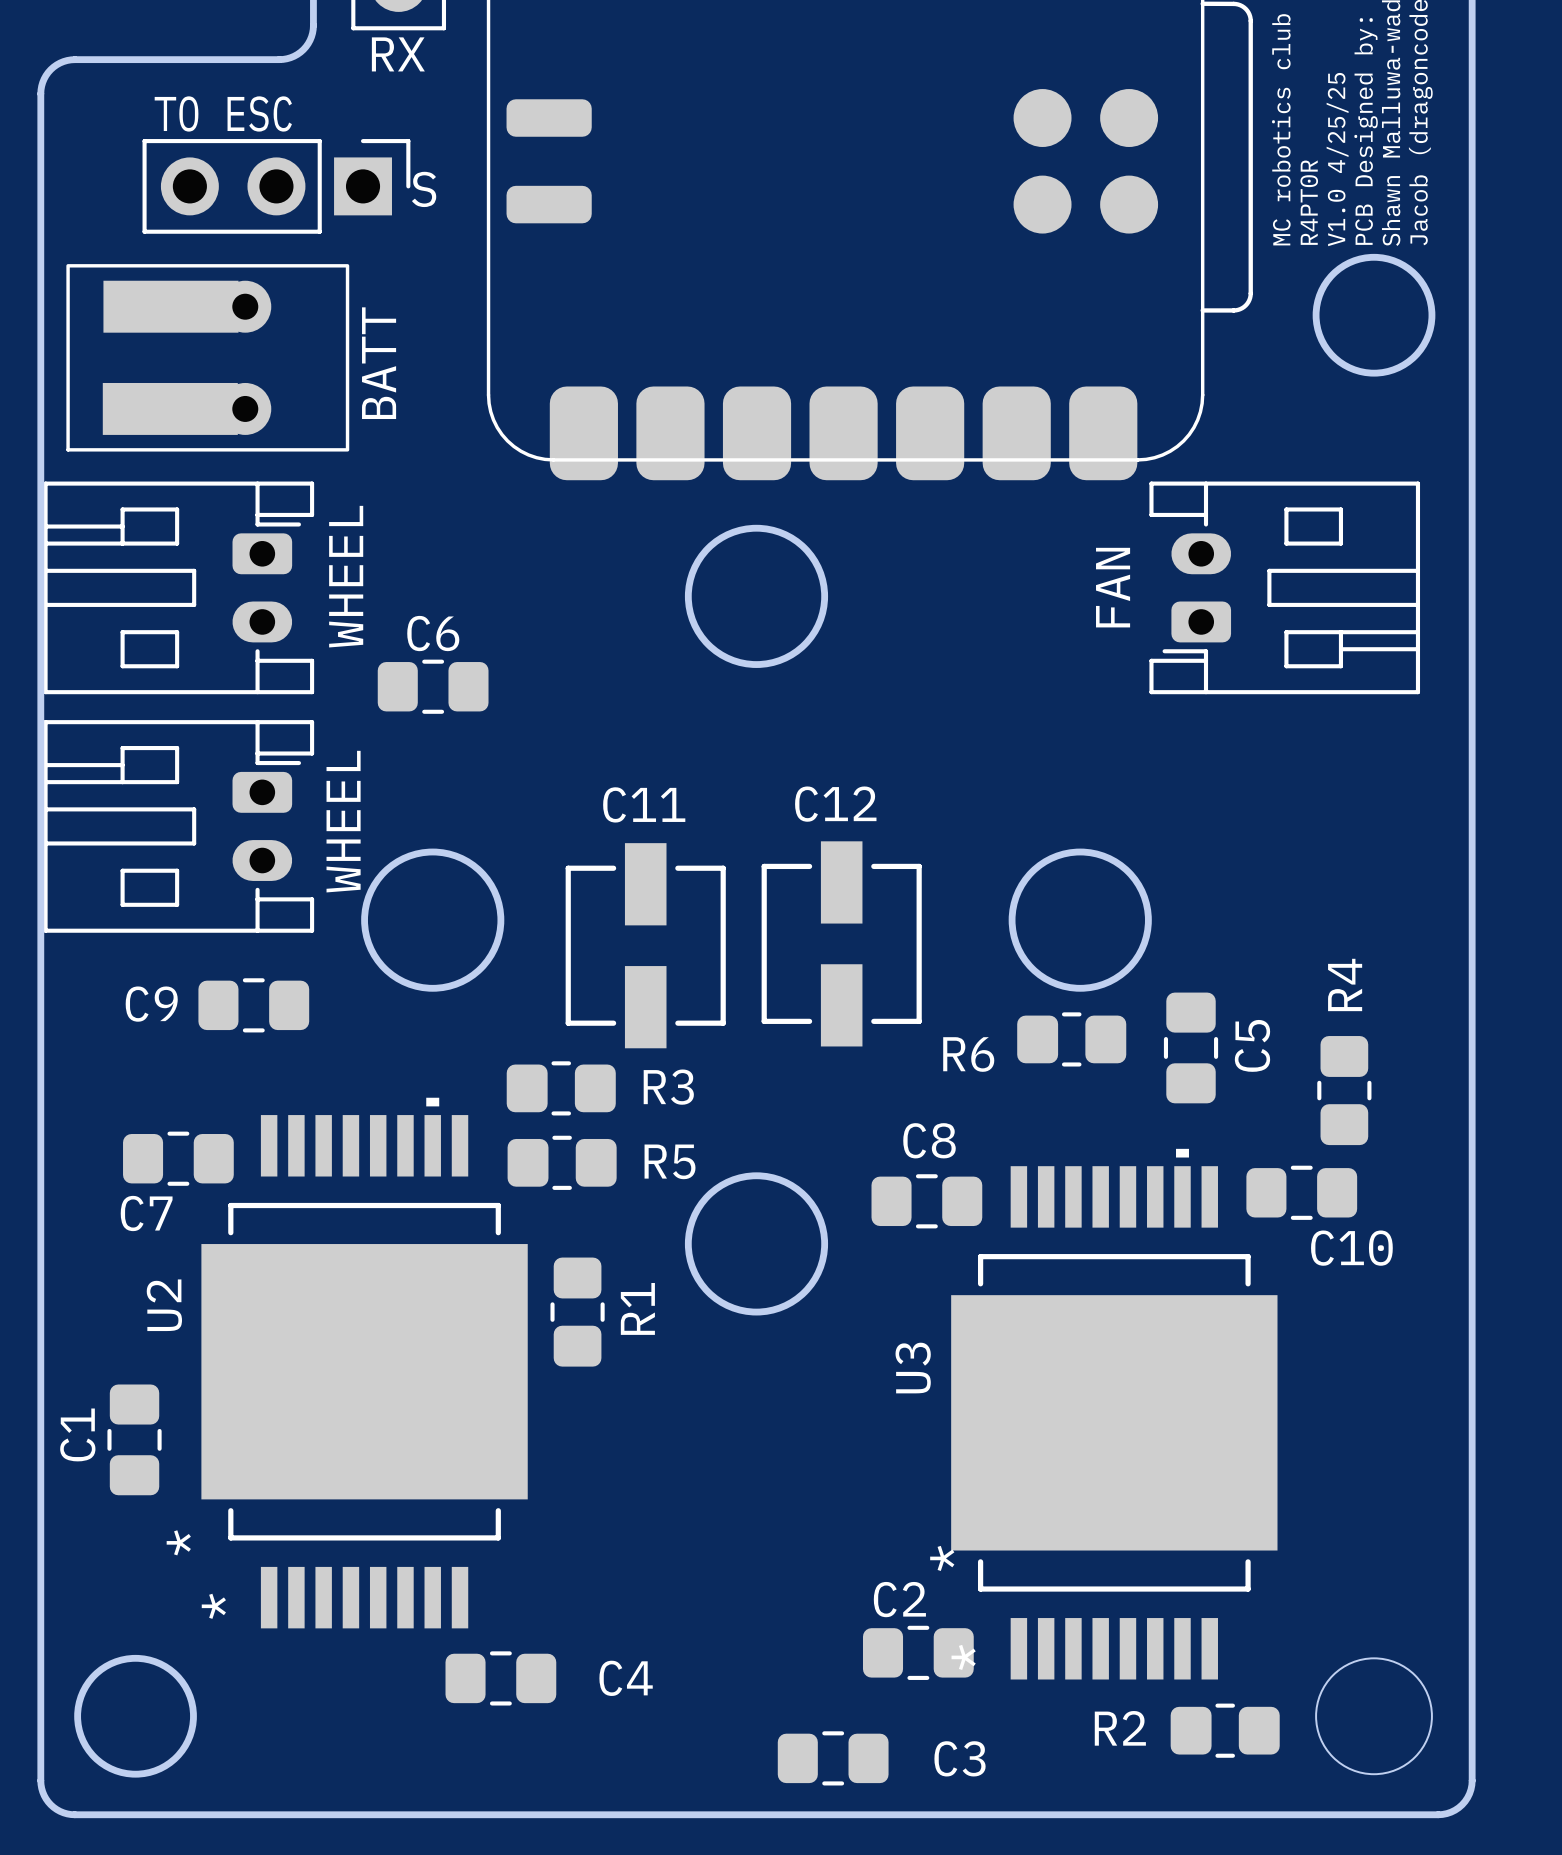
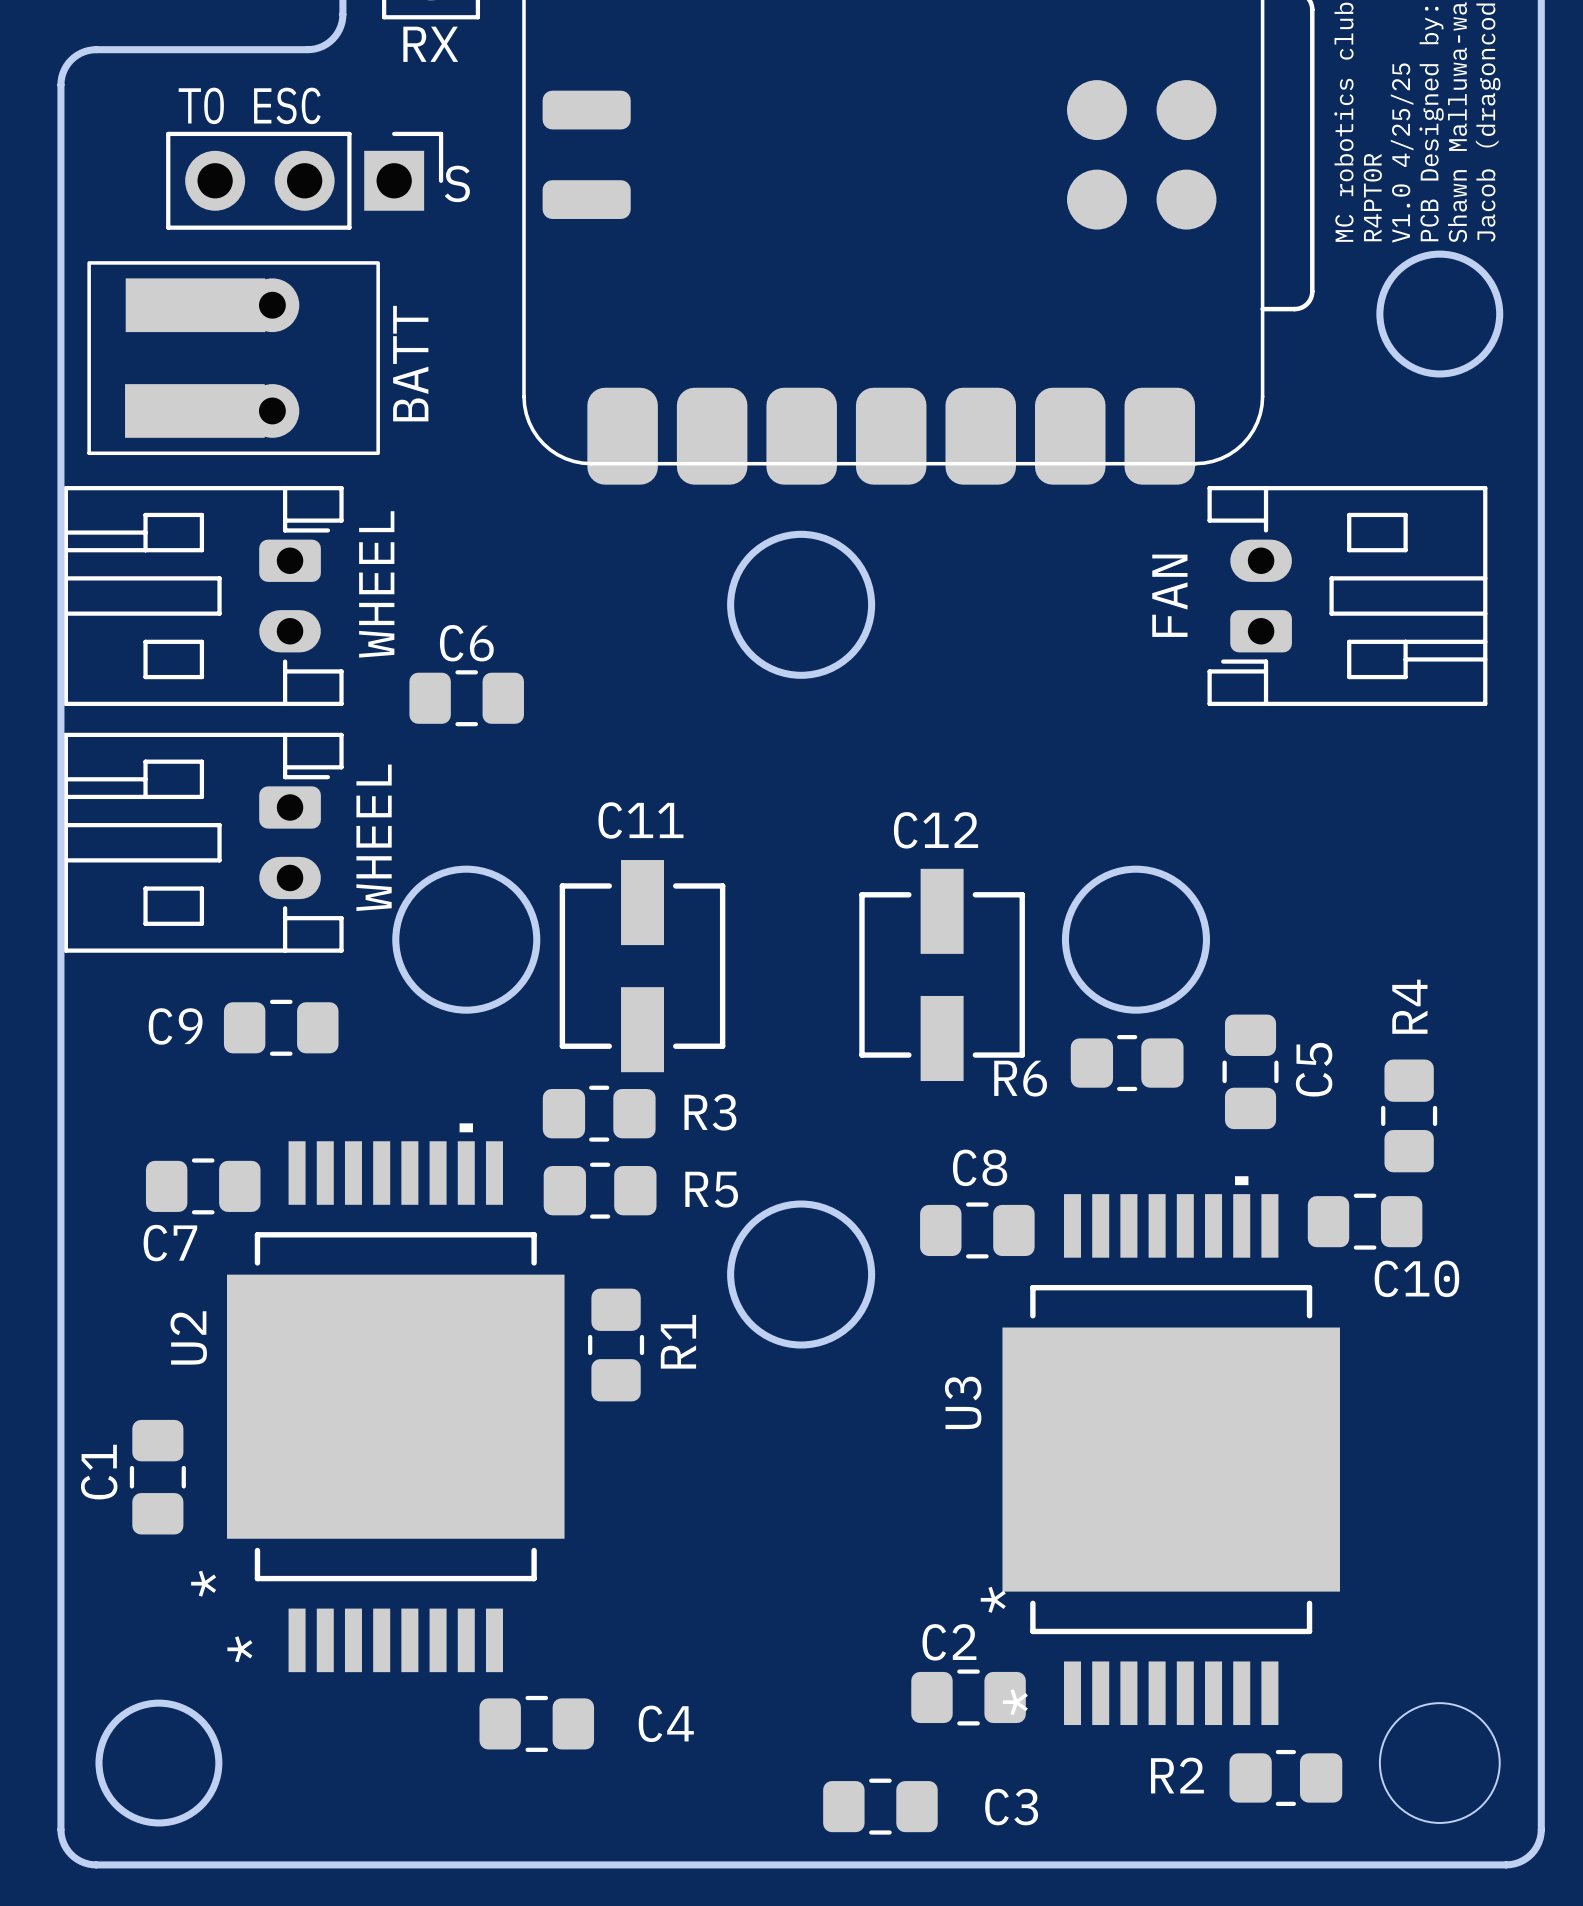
C12 position: (841, 943) -> (942, 974)
C11 position: (645, 945) -> (642, 966)

